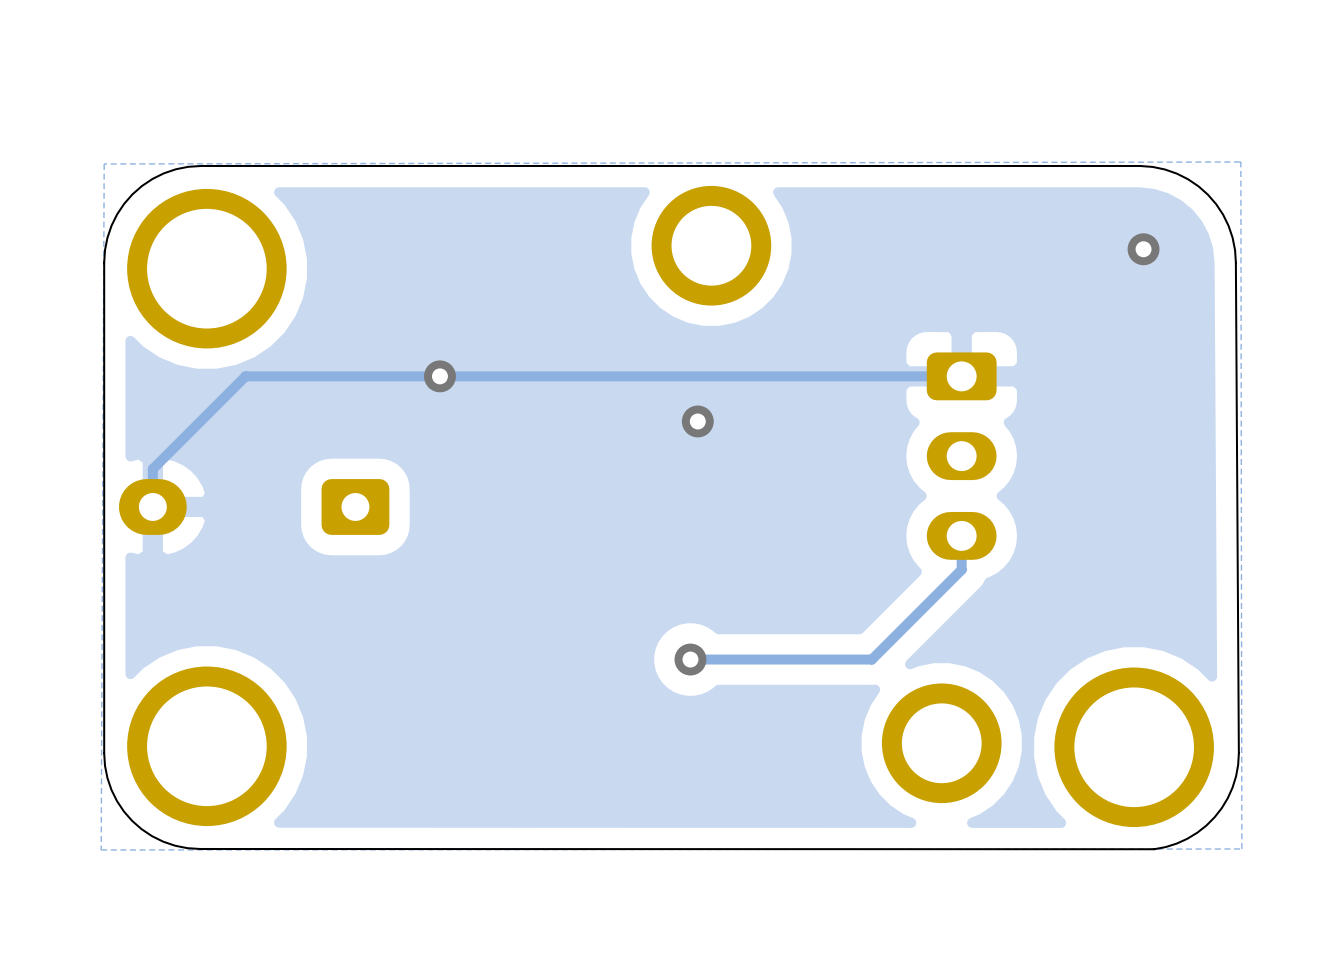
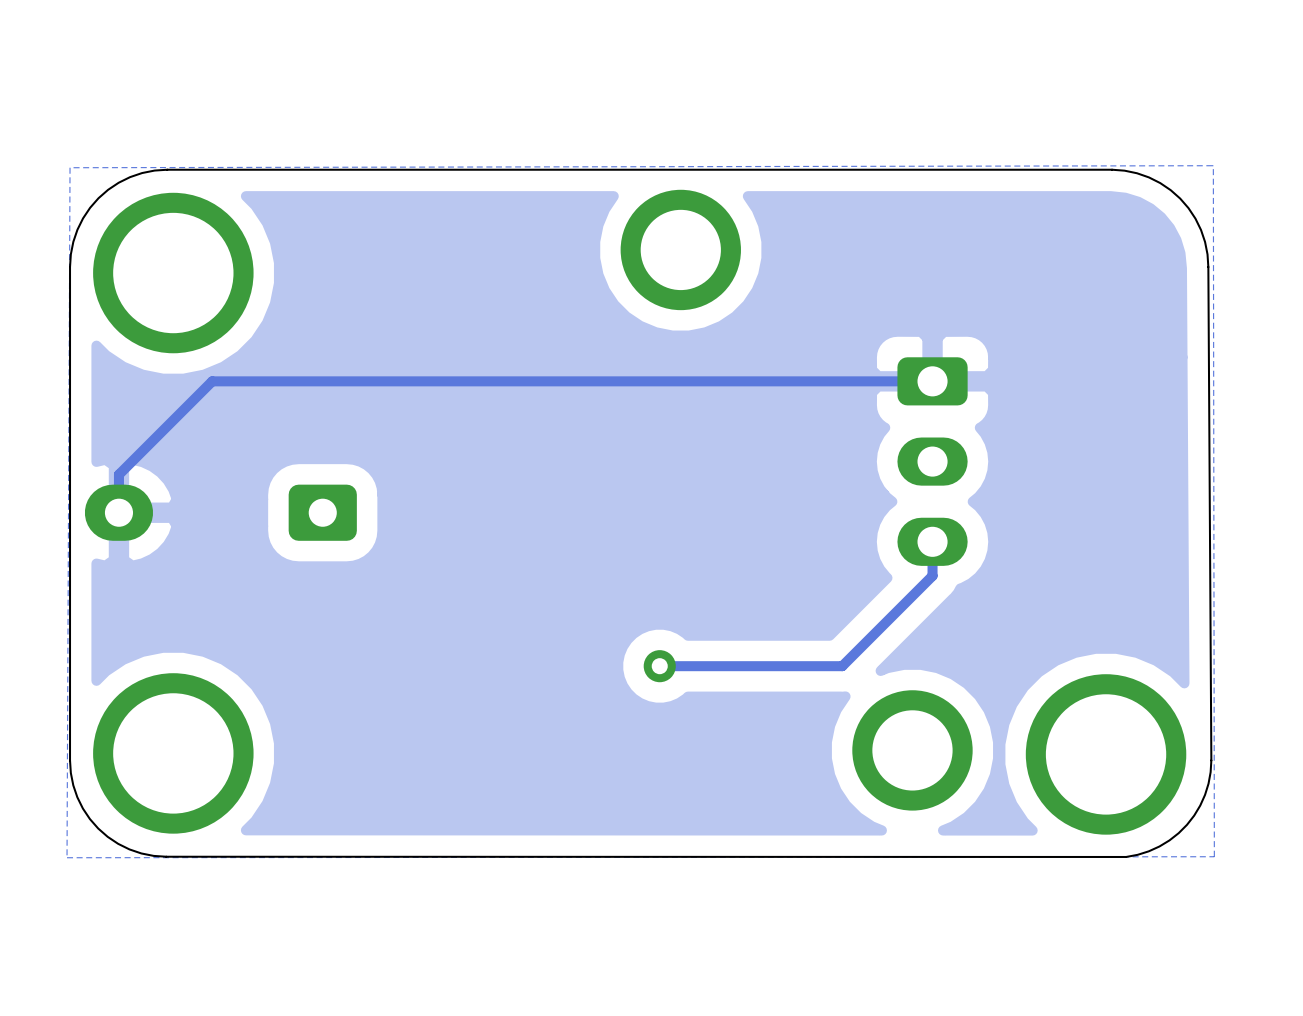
via: (1143, 249) -> none
via: (439, 376) -> none
via: (697, 421) -> none

